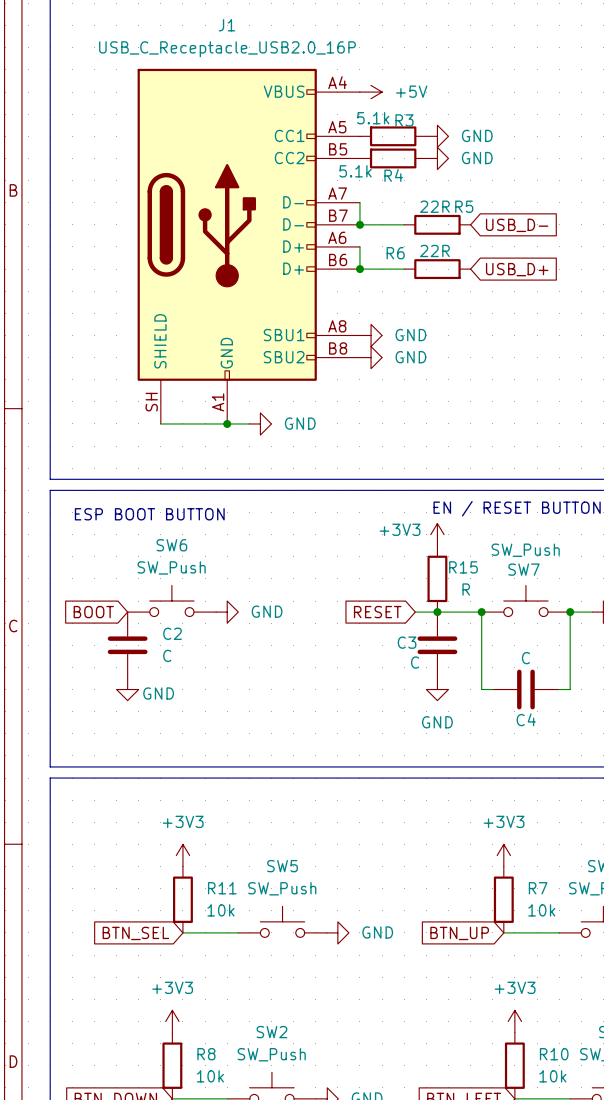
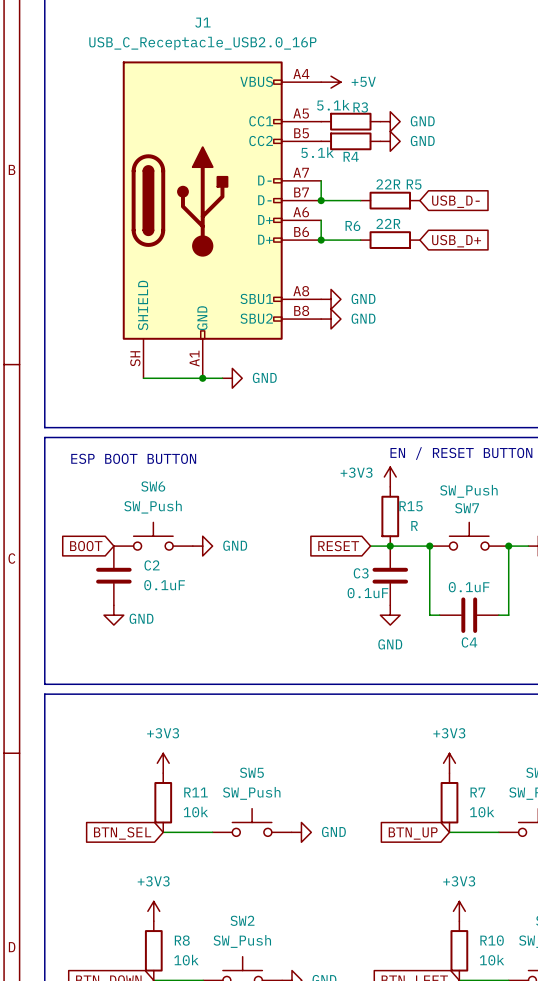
C2 value: C (167, 655) -> 0.1uF (164, 585)
C4 value: C (525, 658) -> 0.1uF (469, 587)
C3 value: C (415, 662) -> 0.1uF (367, 593)

